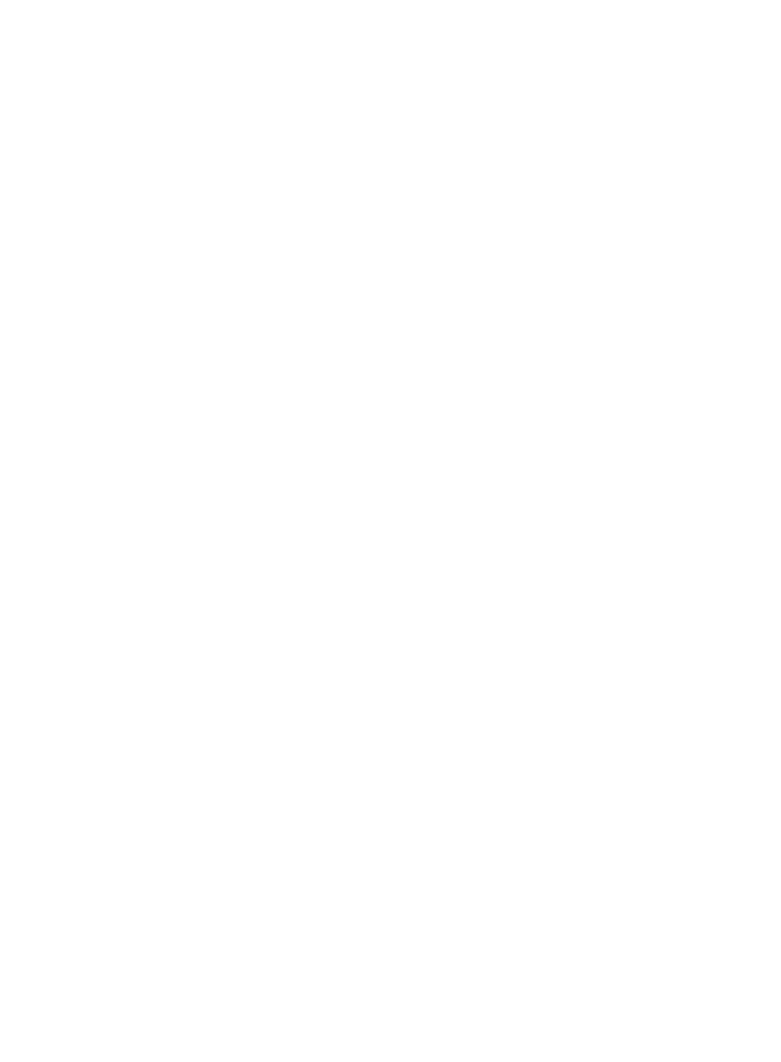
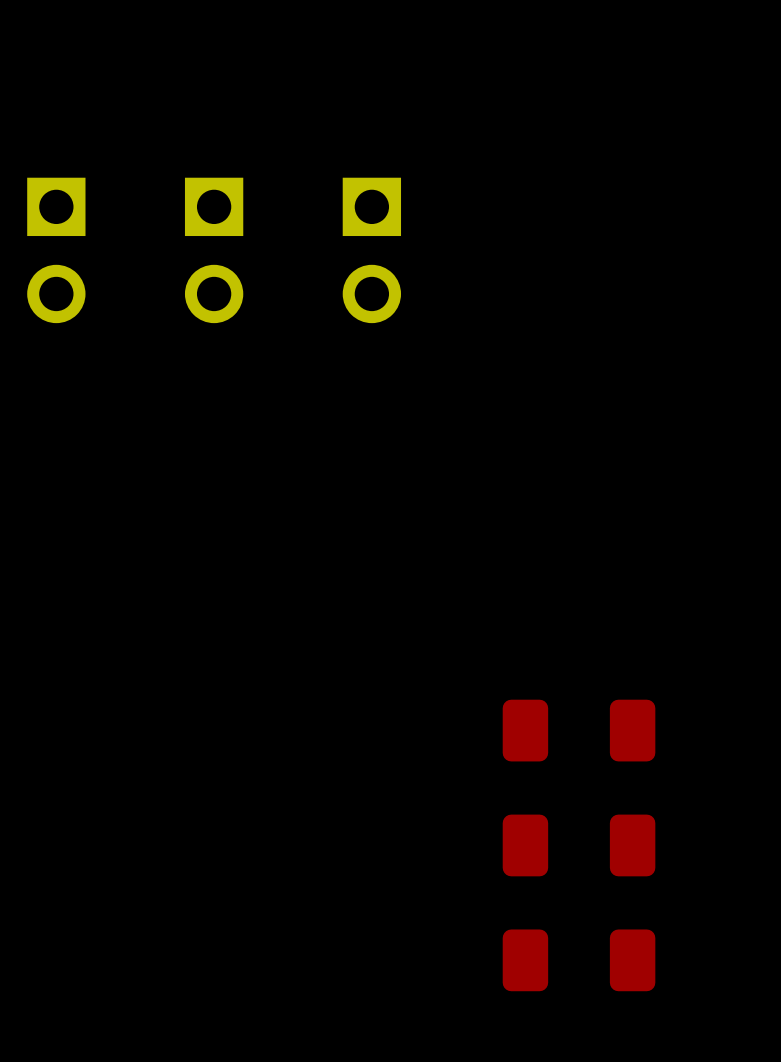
part: none -> (56, 250)
part: none -> (214, 250)
part: none -> (371, 250)
part: none -> (579, 730)
part: none -> (579, 845)
part: none -> (579, 960)

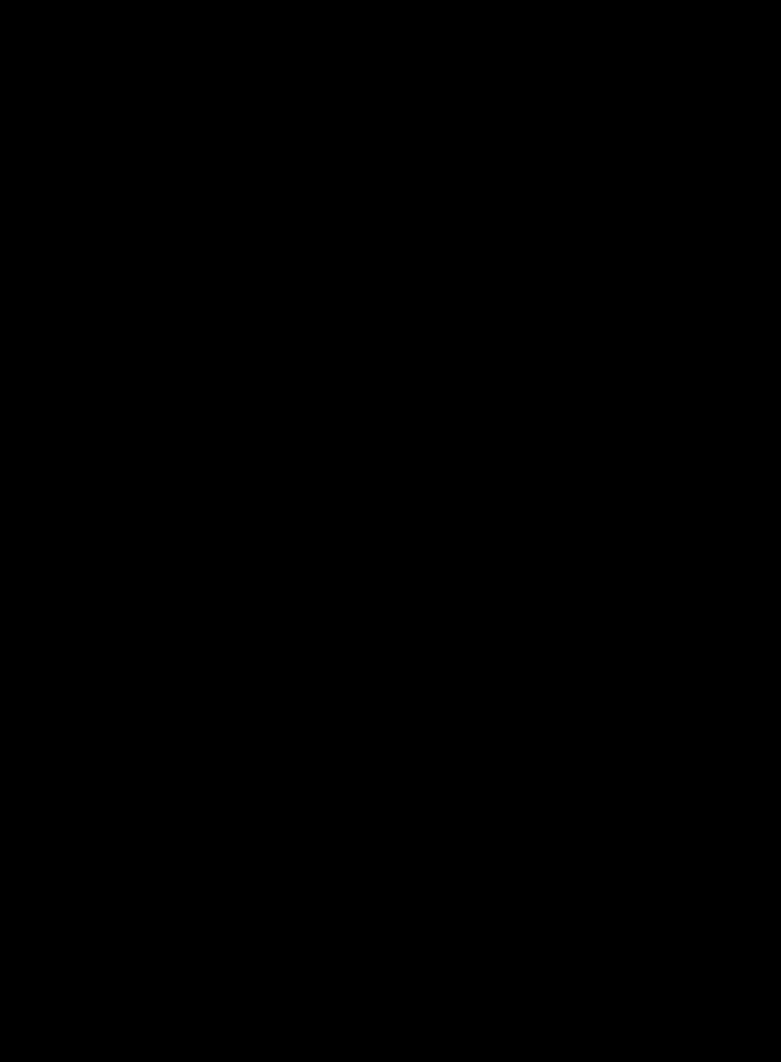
part: (56, 250) -> none
part: (214, 250) -> none
part: (371, 250) -> none
part: (579, 730) -> none
part: (579, 845) -> none
part: (579, 960) -> none

